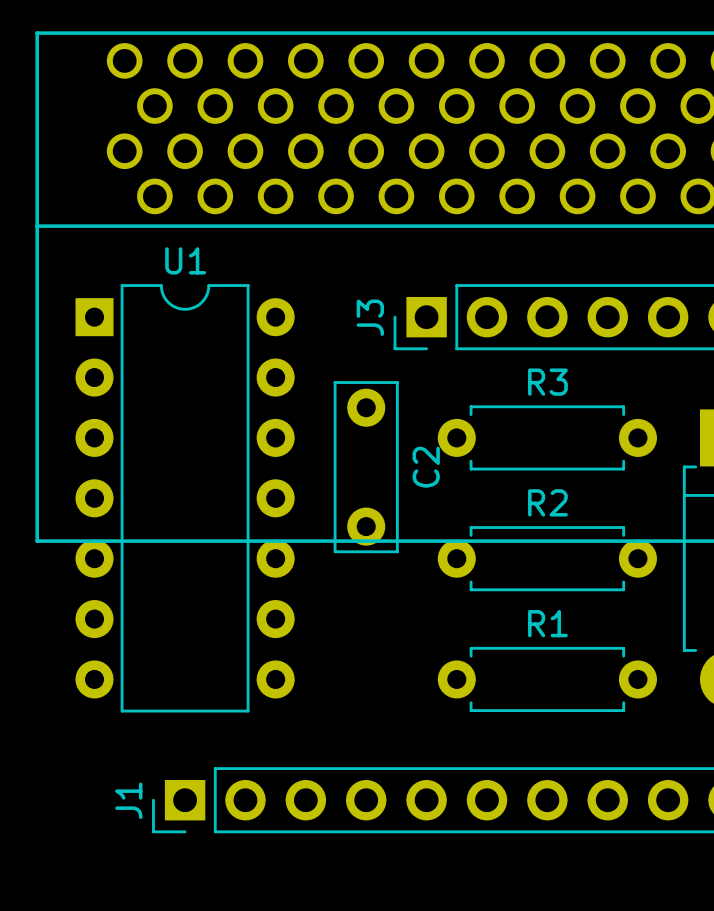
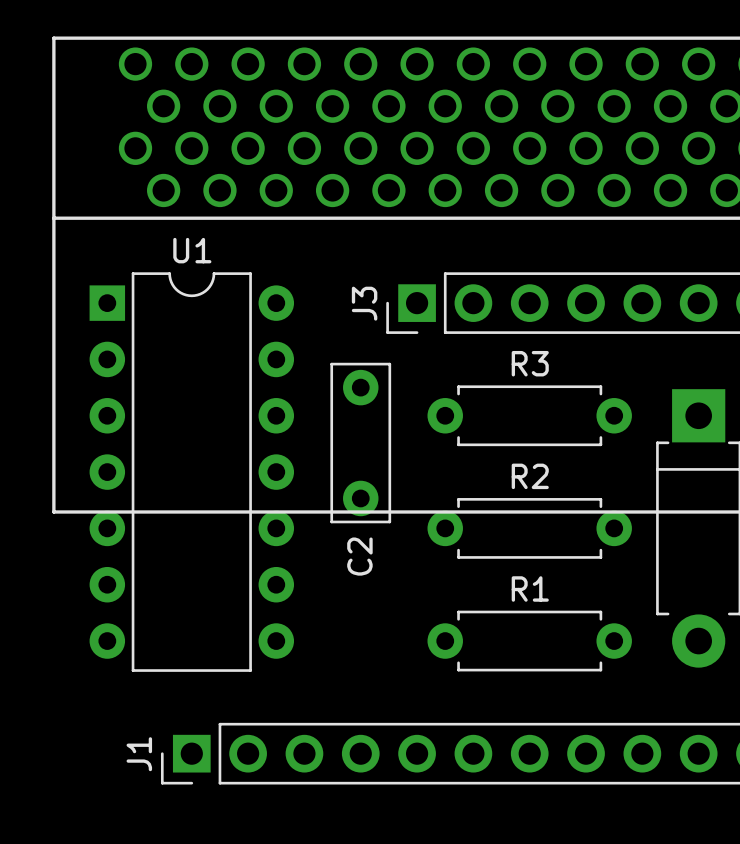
C2 name position: C2 (426, 467) -> C2 (359, 556)

